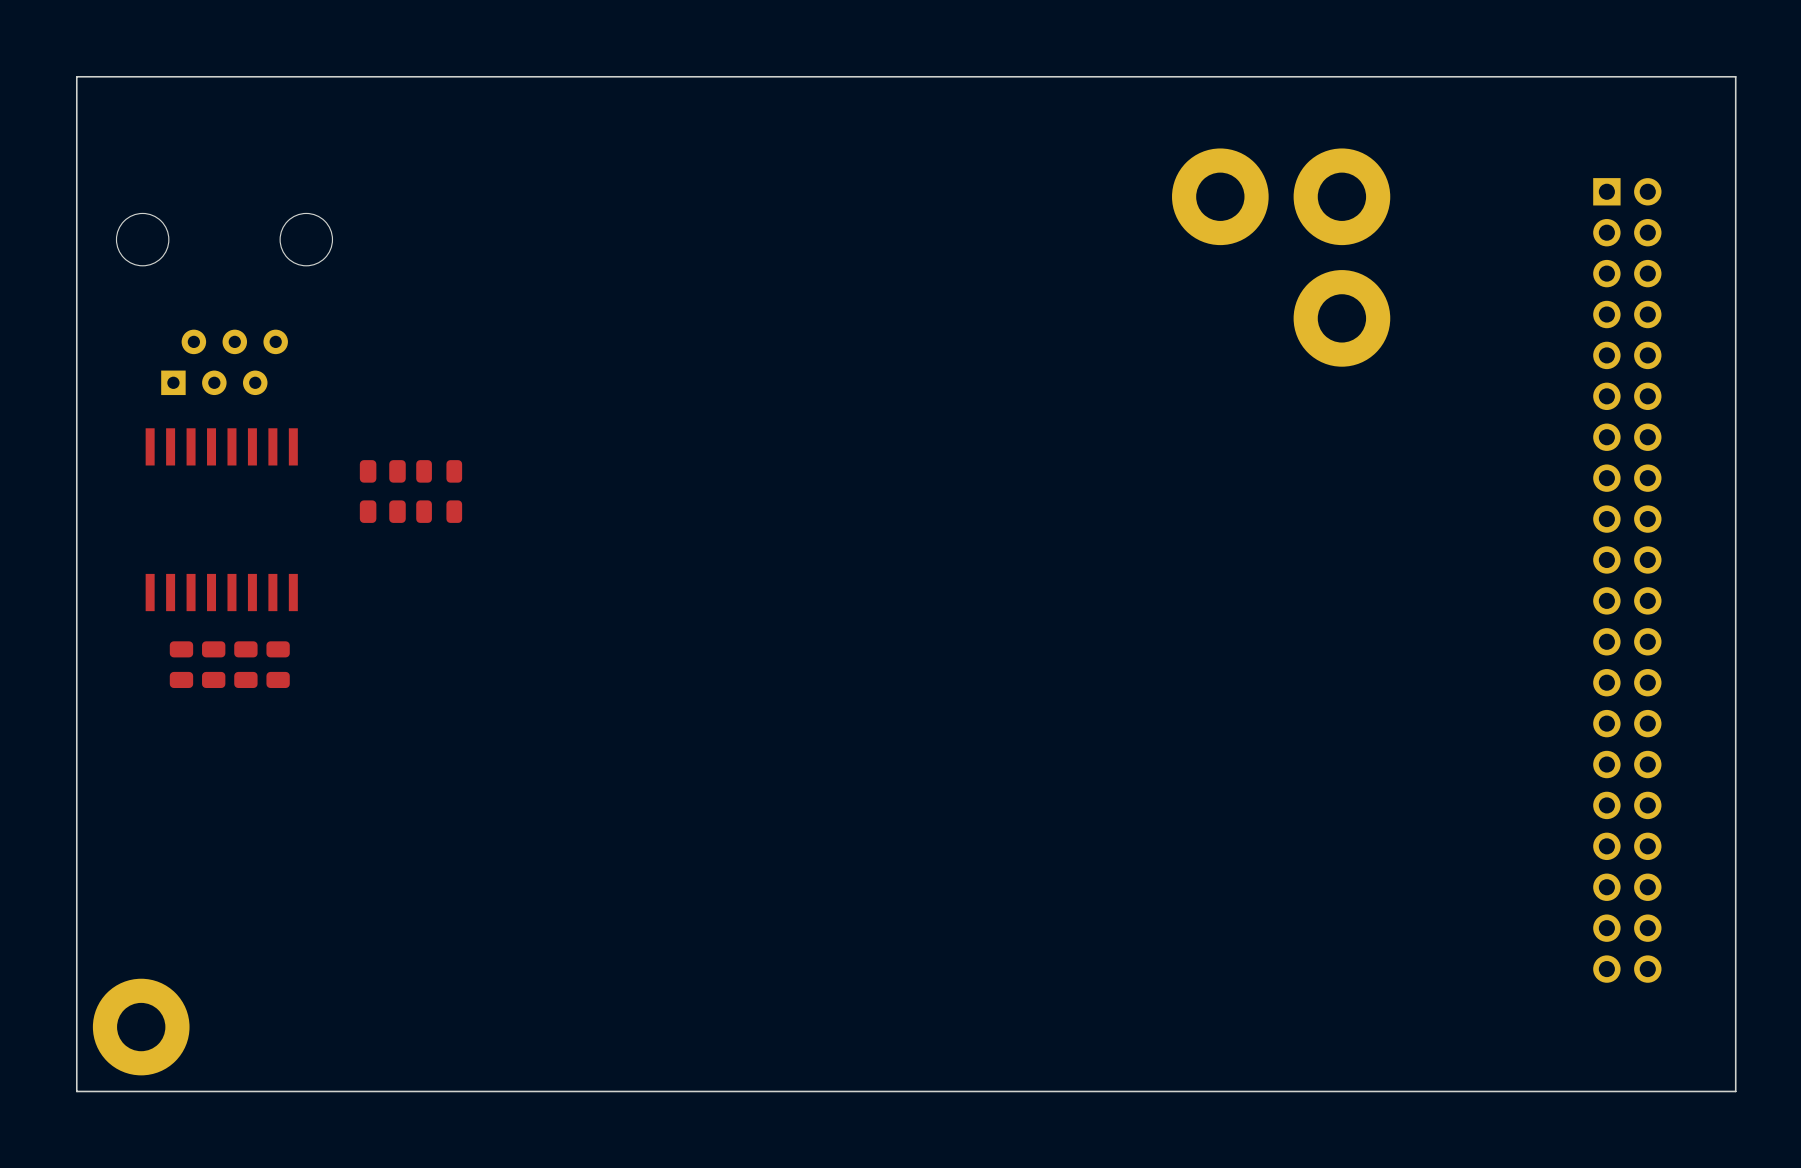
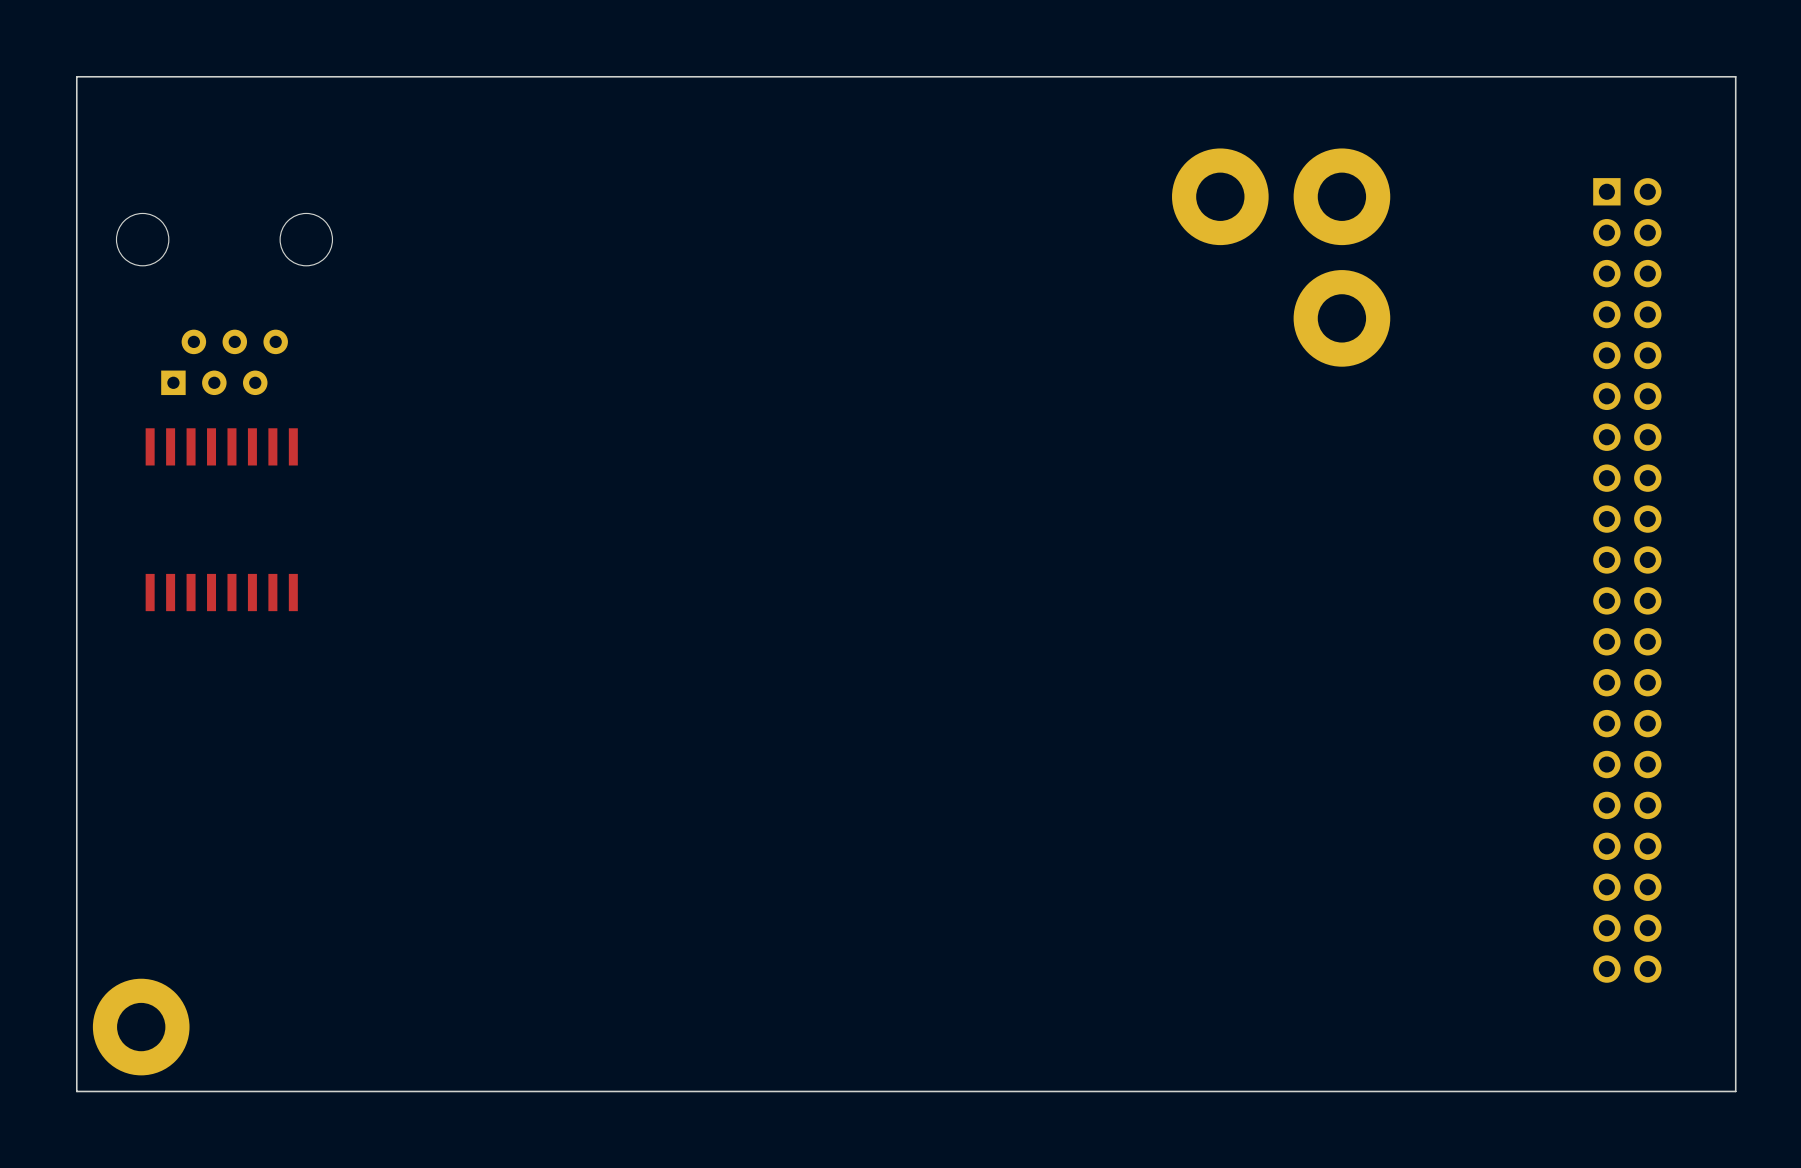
part: (382, 471) -> none
part: (439, 471) -> none
part: (382, 511) -> none
part: (439, 511) -> none
part: (181, 664) -> none
part: (213, 664) -> none
part: (245, 664) -> none
part: (278, 664) -> none

